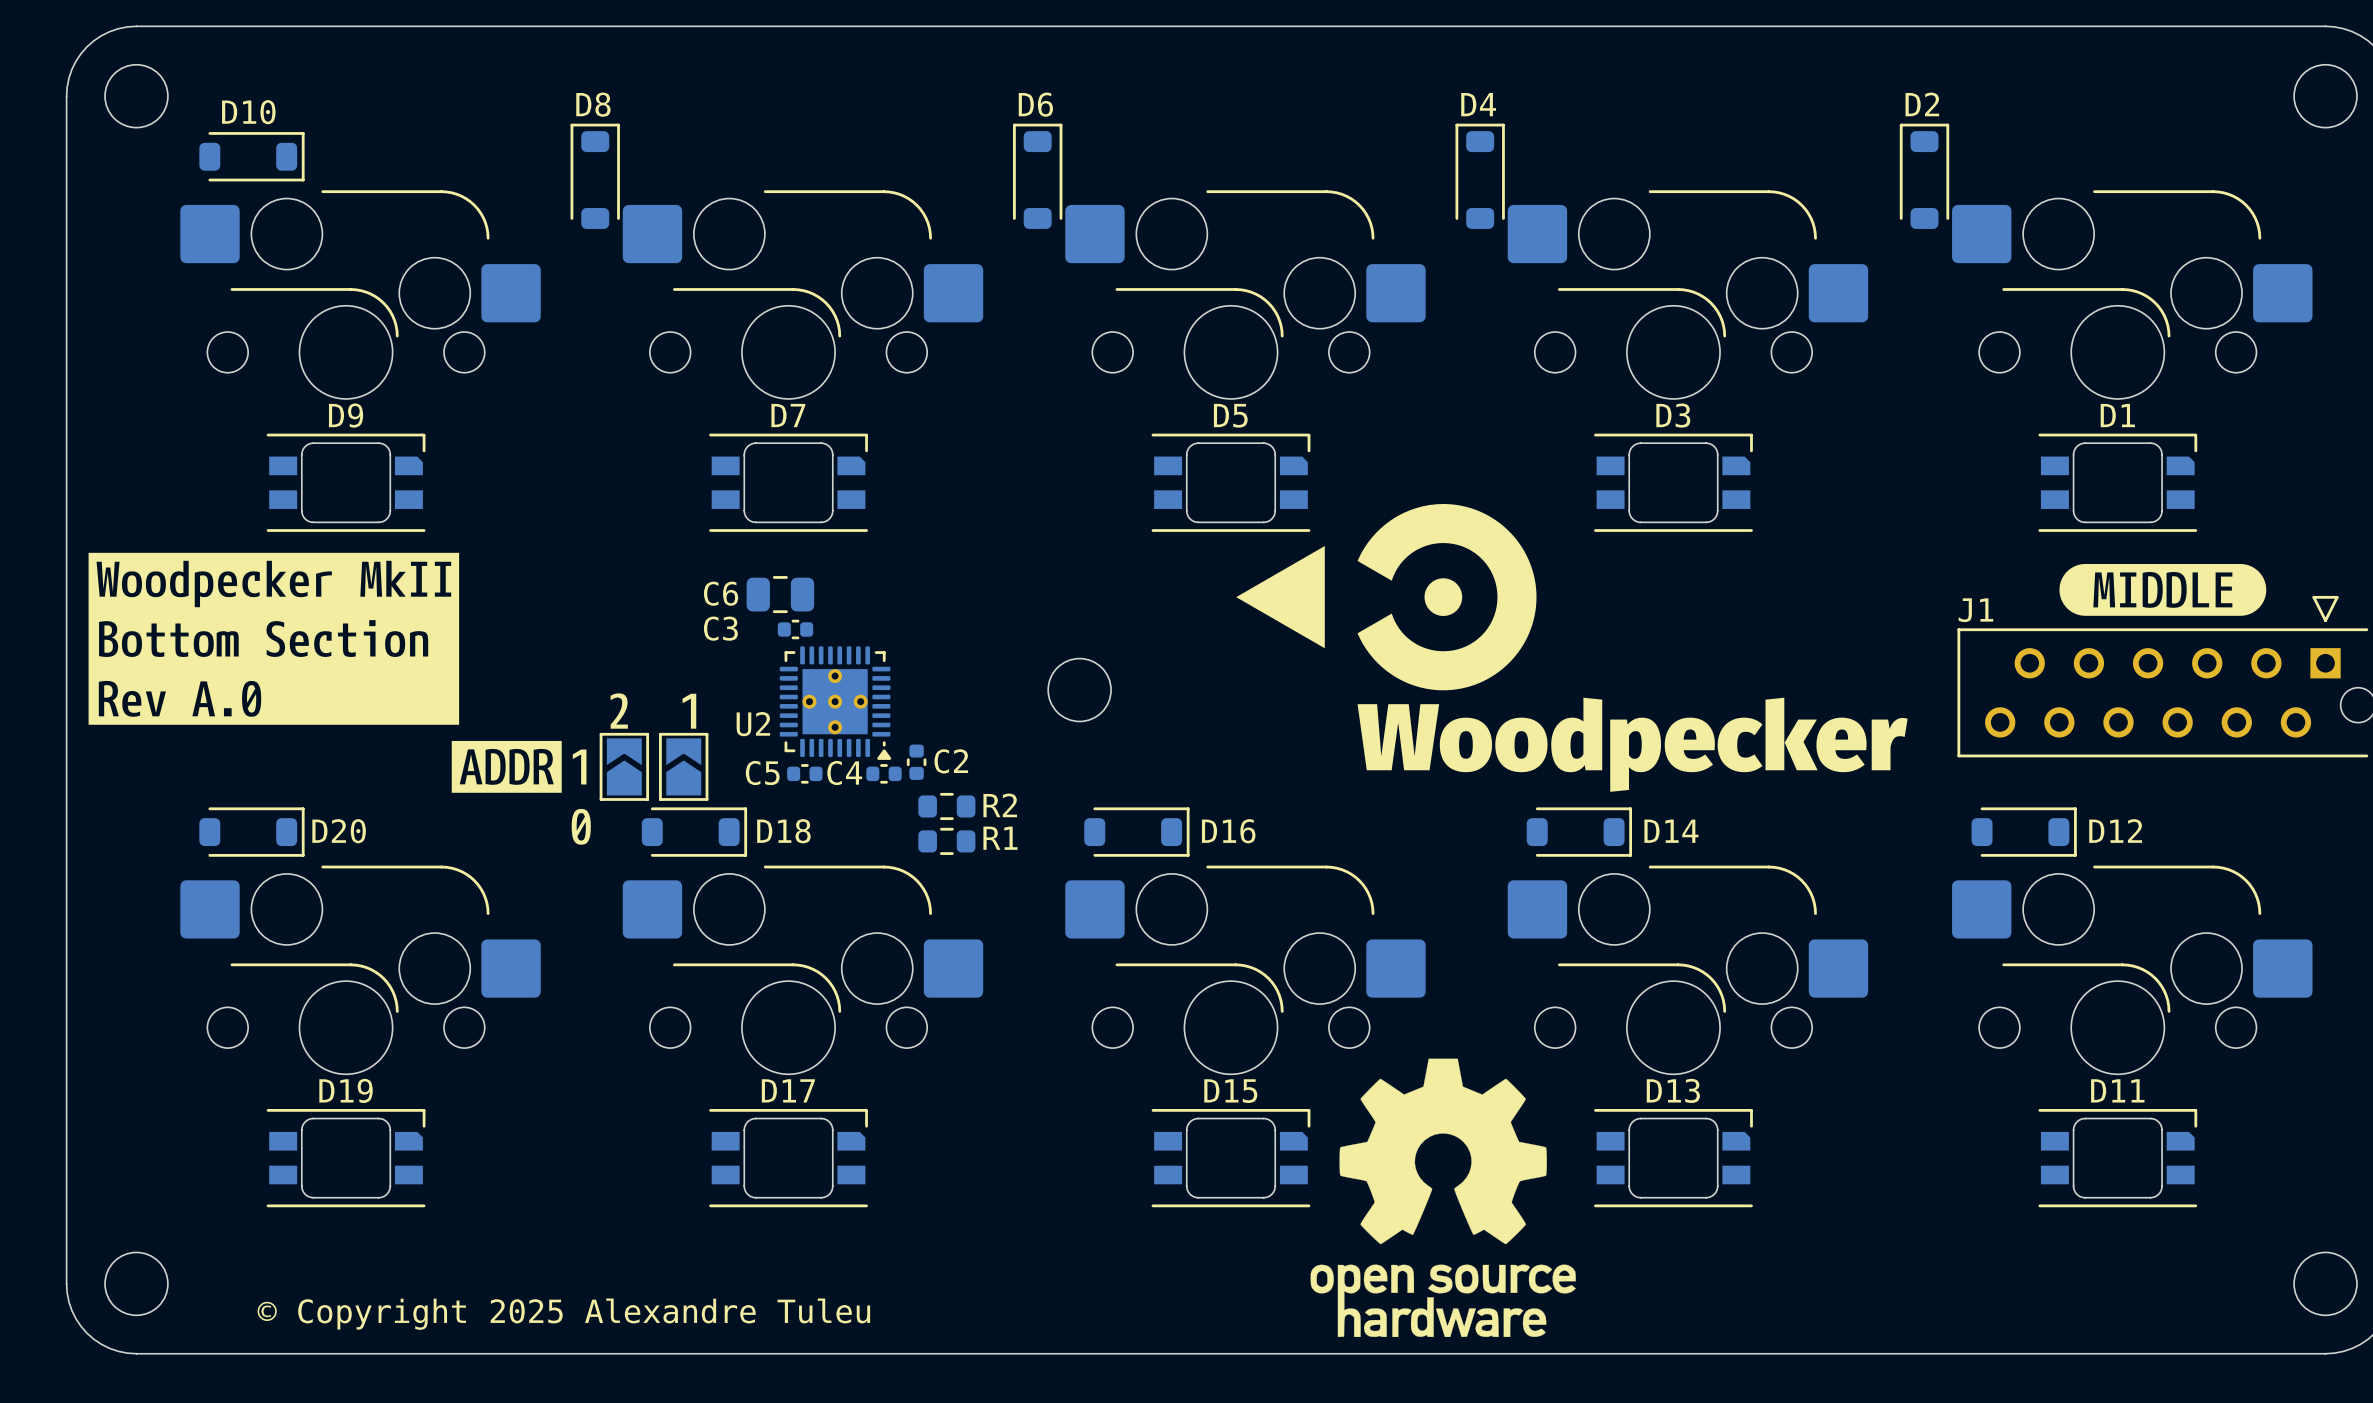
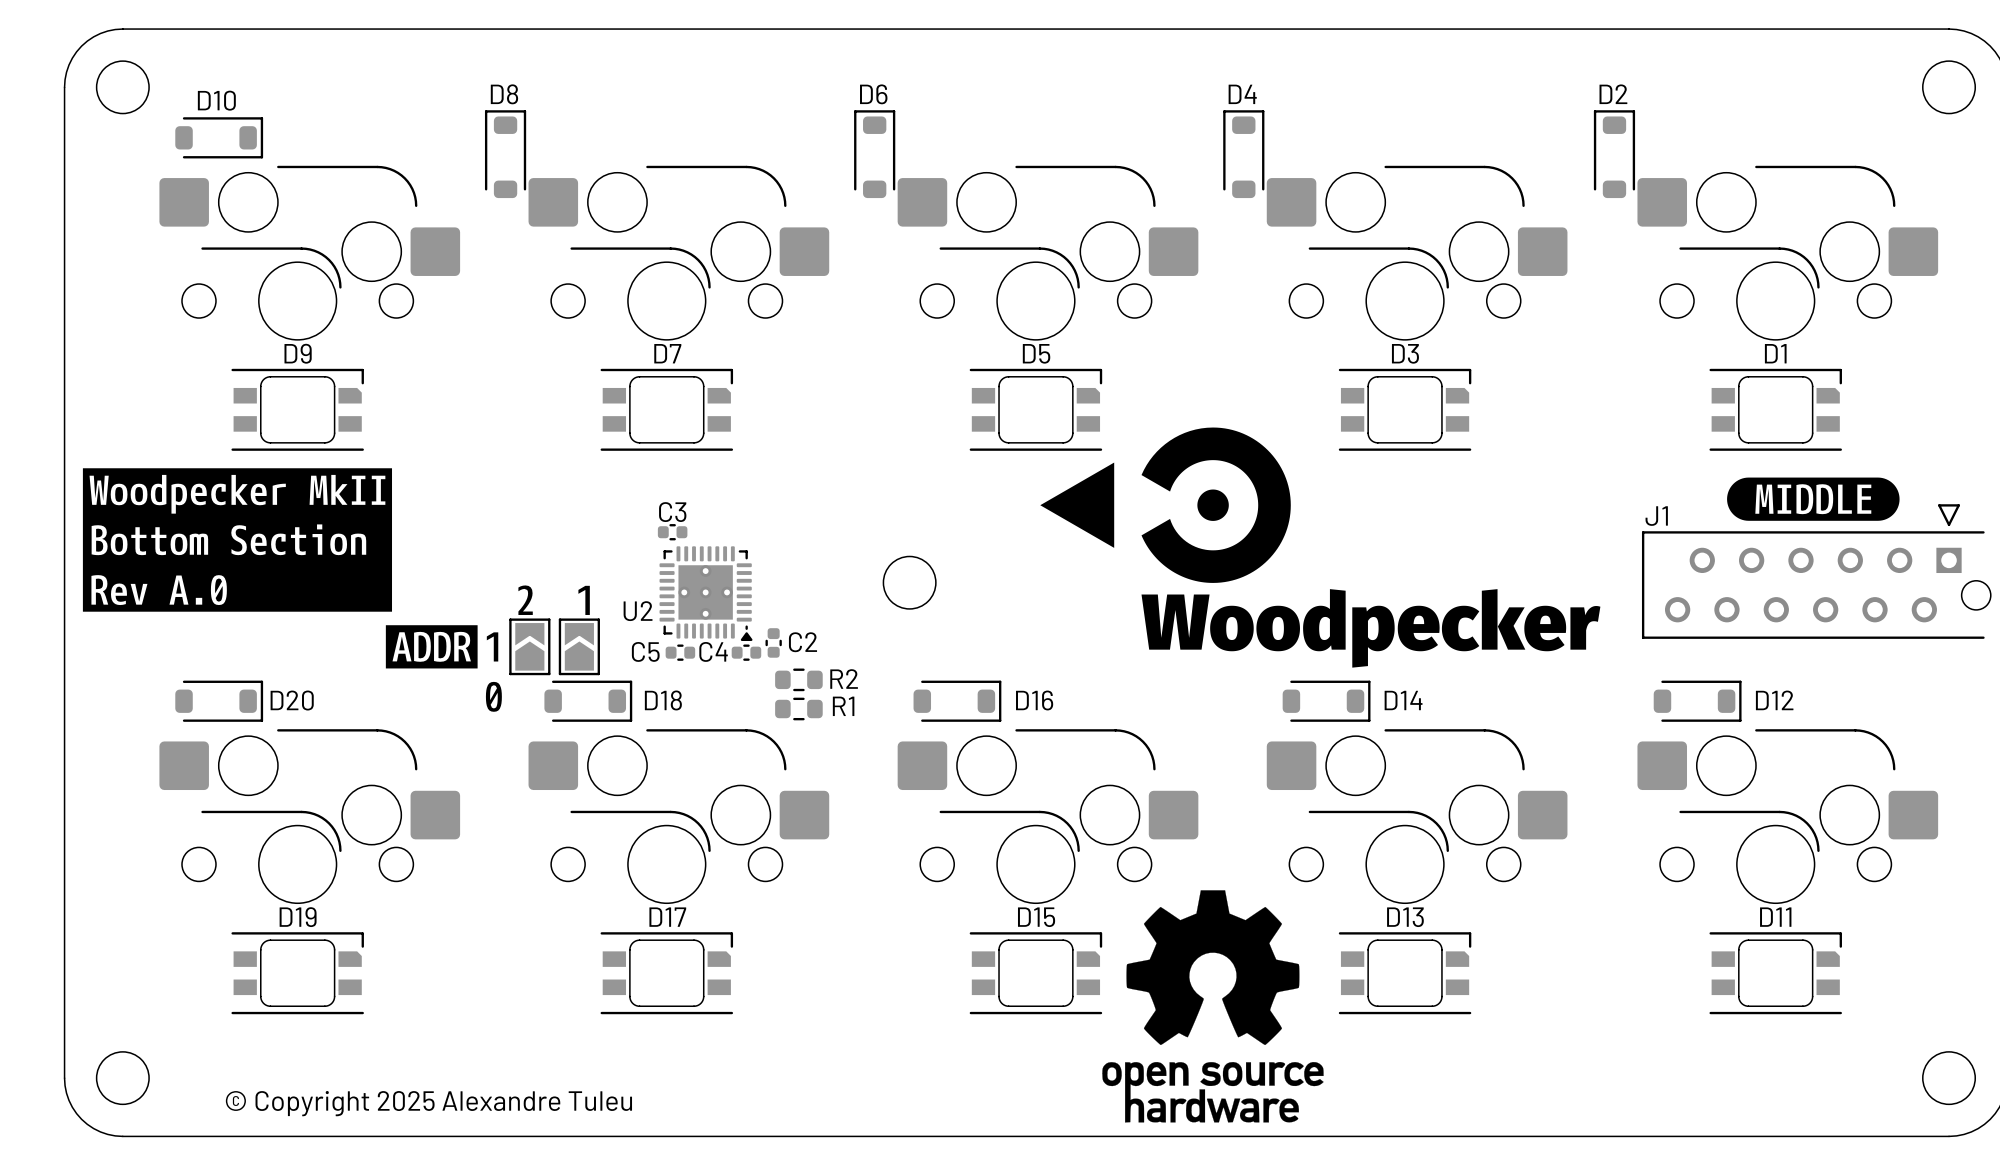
C6: (780, 594) -> none
C3 name position: C3 (720, 628) -> C3 (672, 512)

